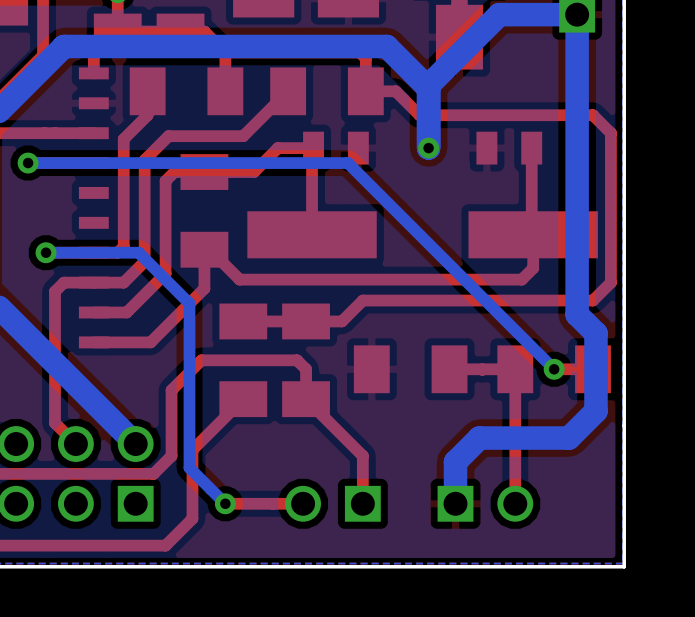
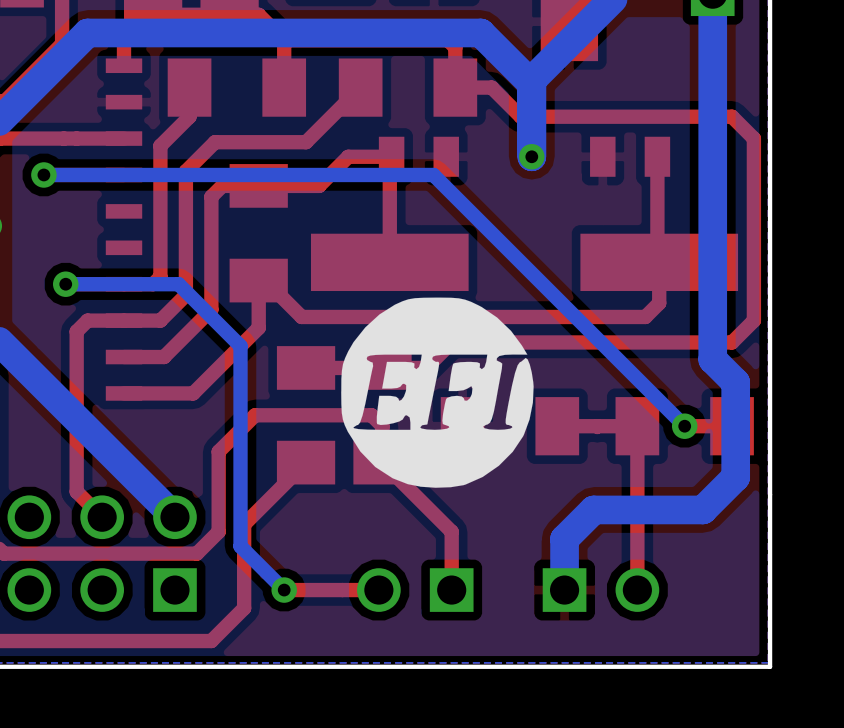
drawing: none -> [341, 297, 534, 488]

